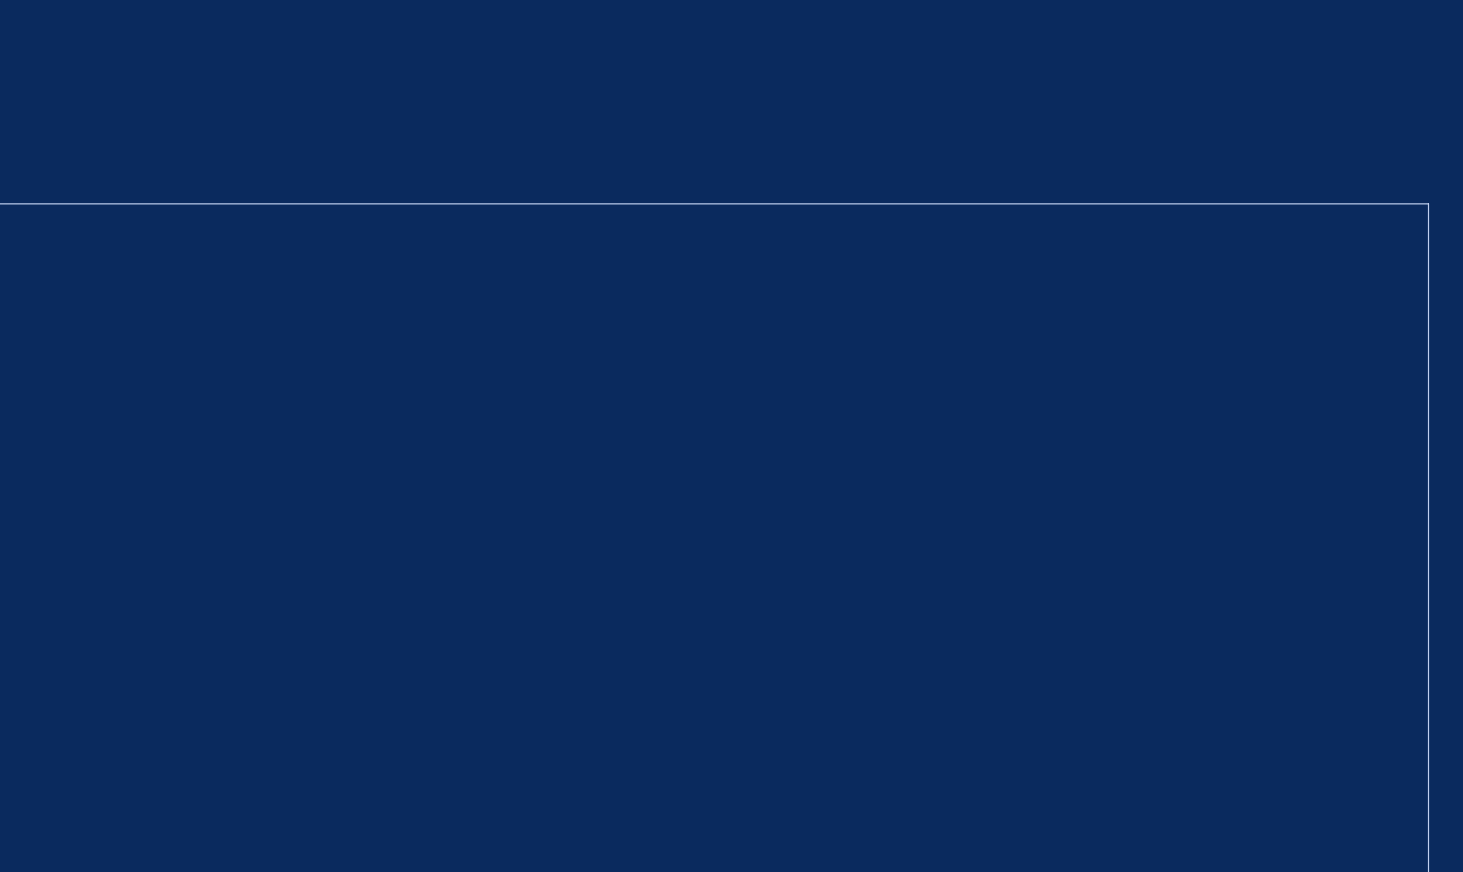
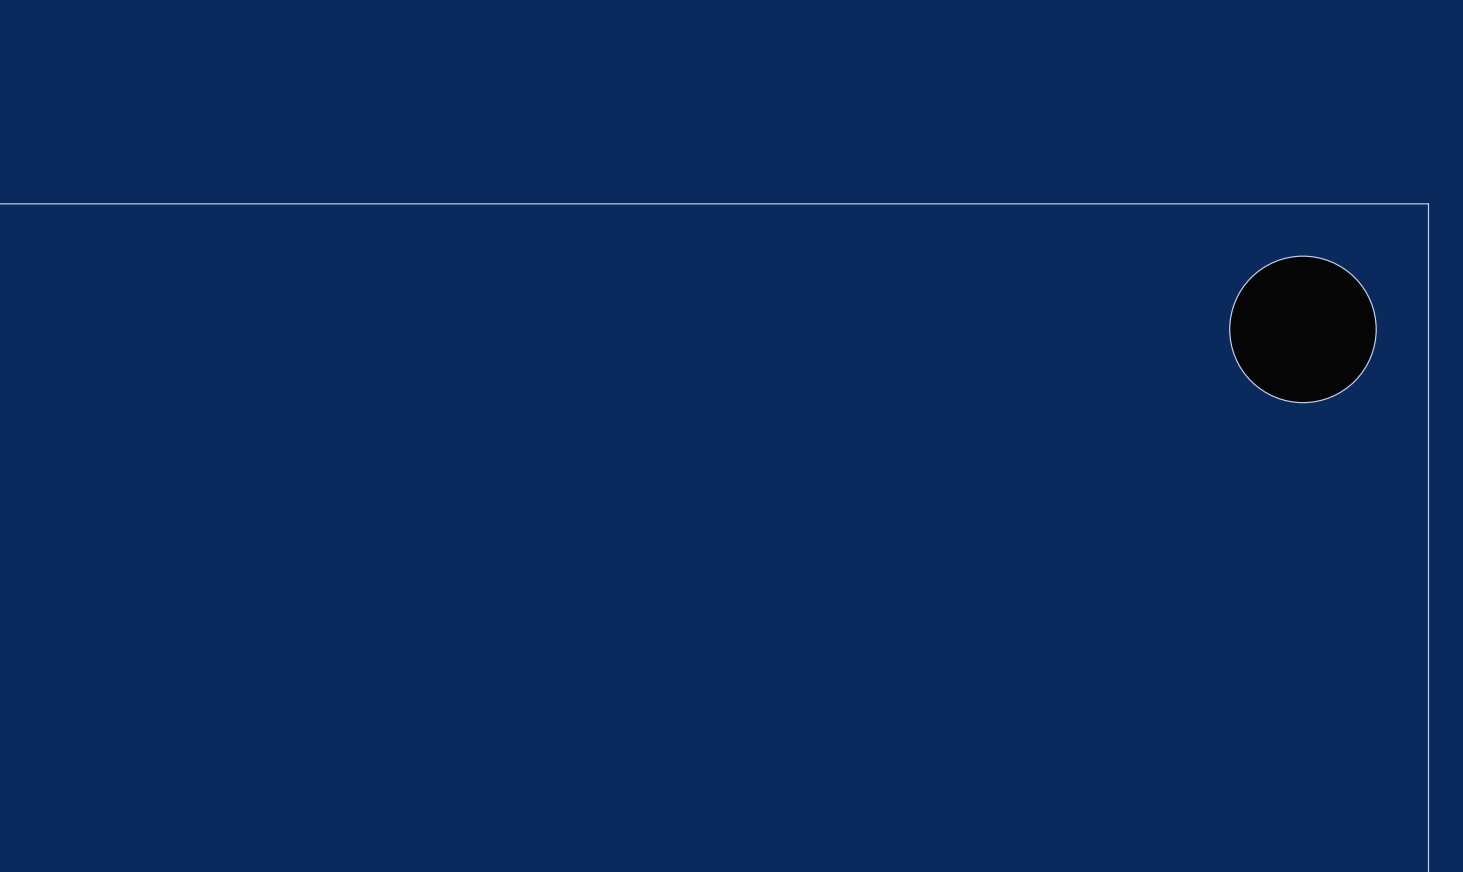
part: none -> (1302, 329)

